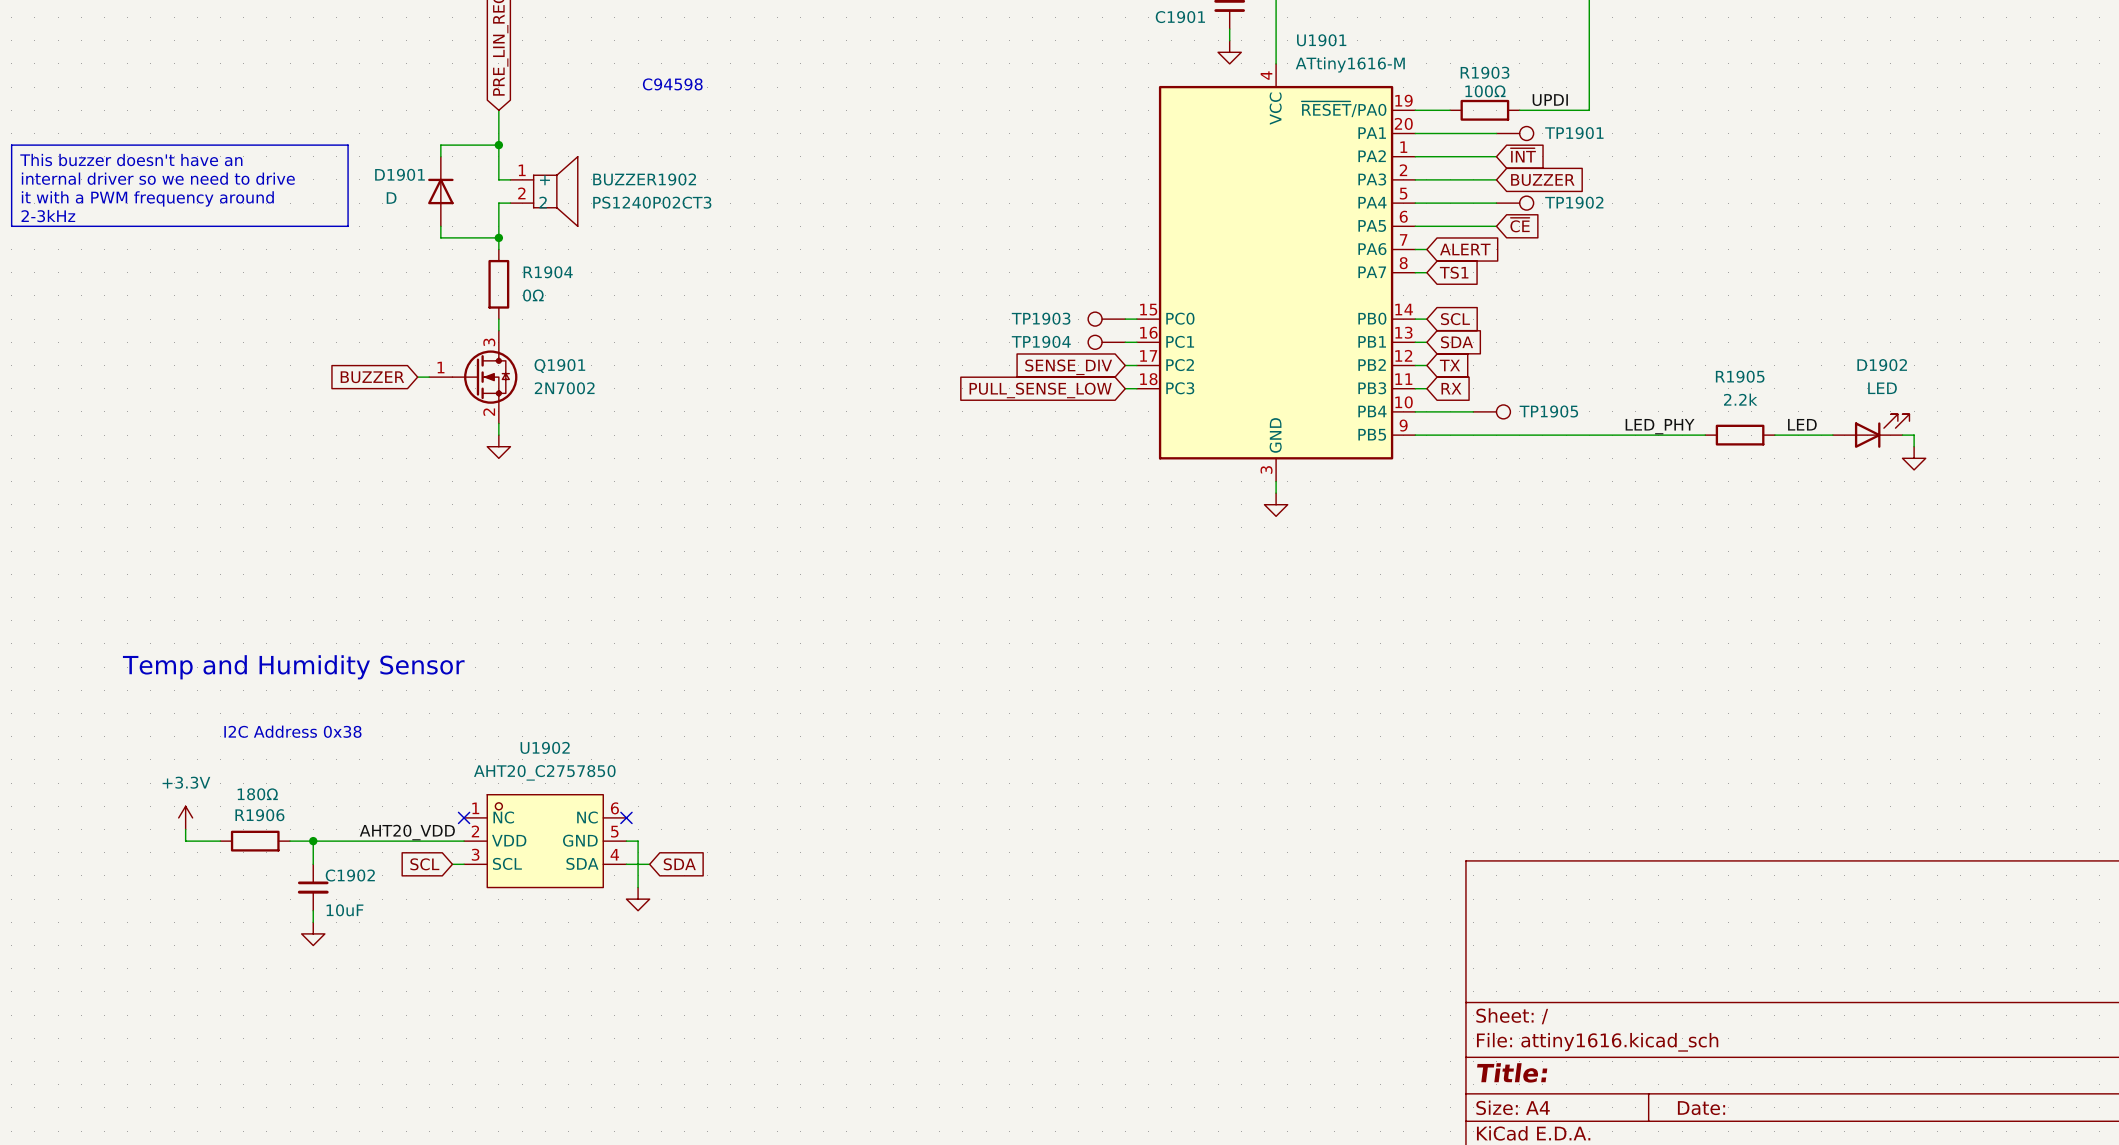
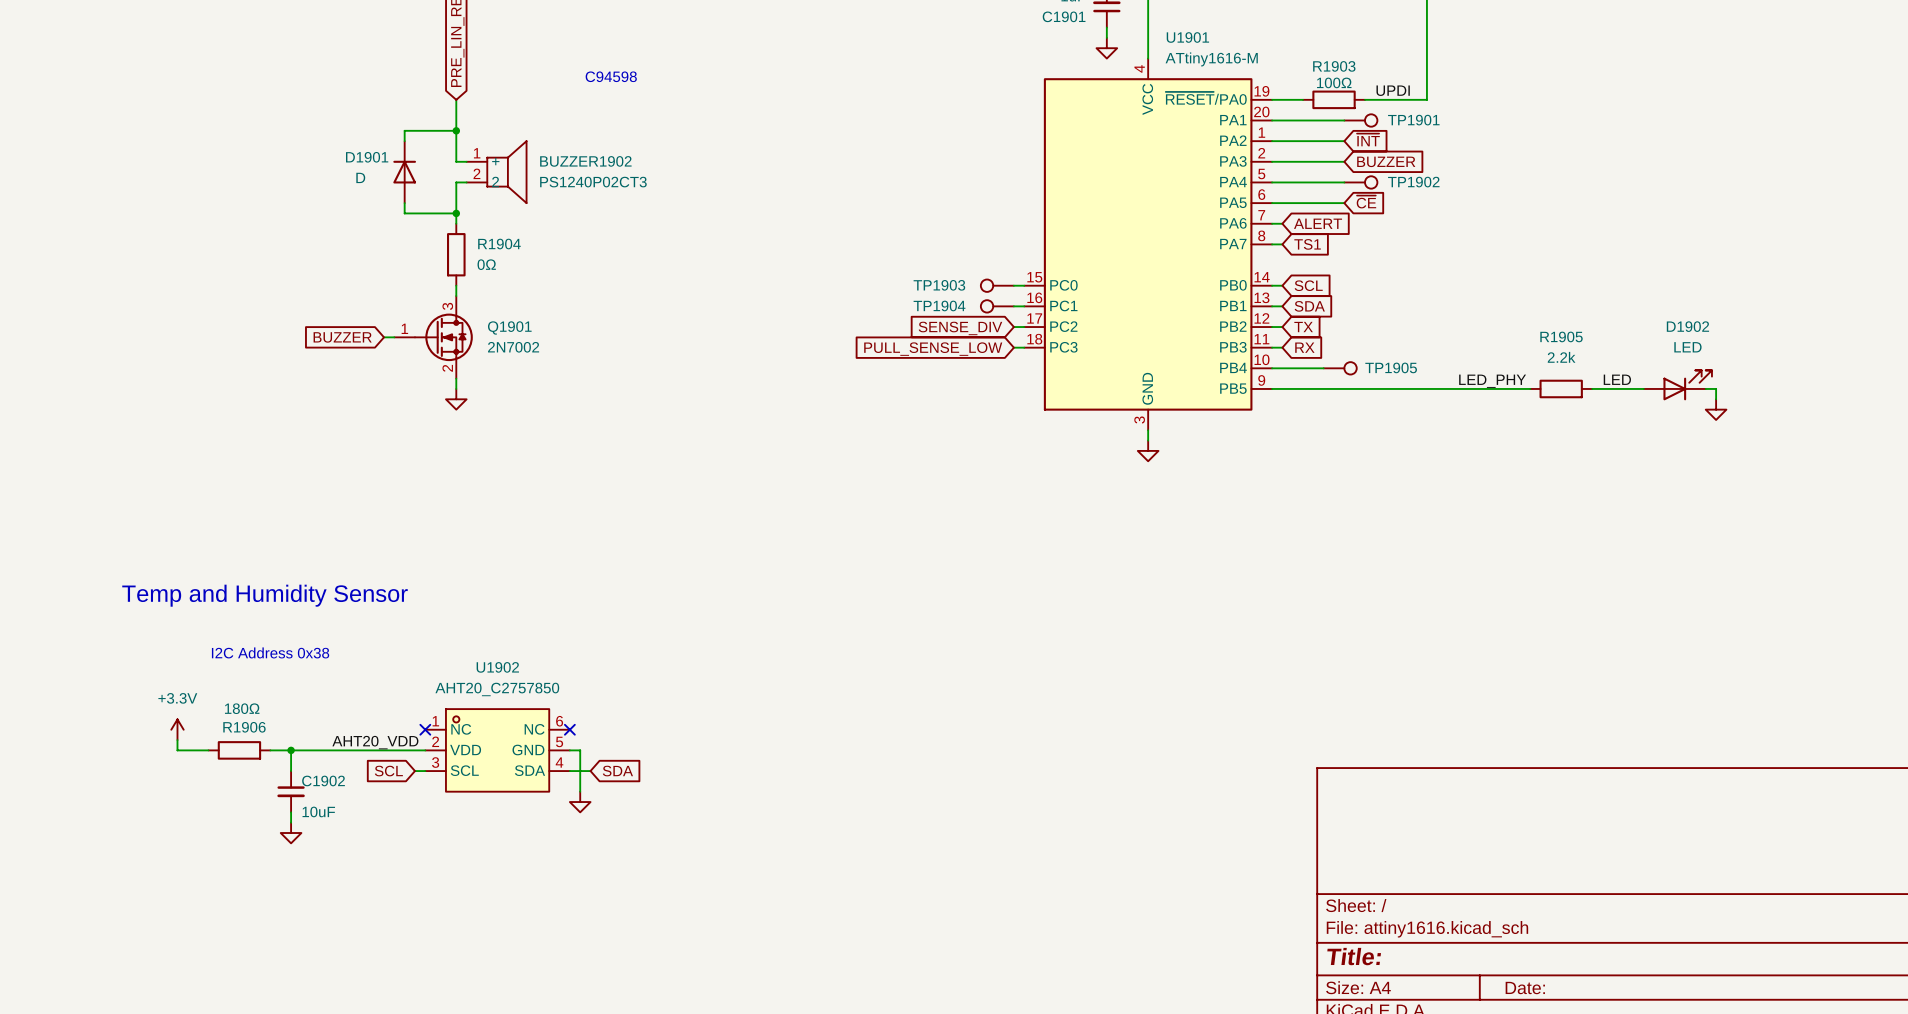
line: (11, 145) (348, 145) (348, 226) (11, 226) (11, 145) -> none
text: This buzzer doesn't have an (131, 160) -> none
text: internal driver so we need to drive (158, 178) -> none
text: it with a PWM frequency around (147, 198) -> none
text: 2-3kHz (48, 216) -> none

